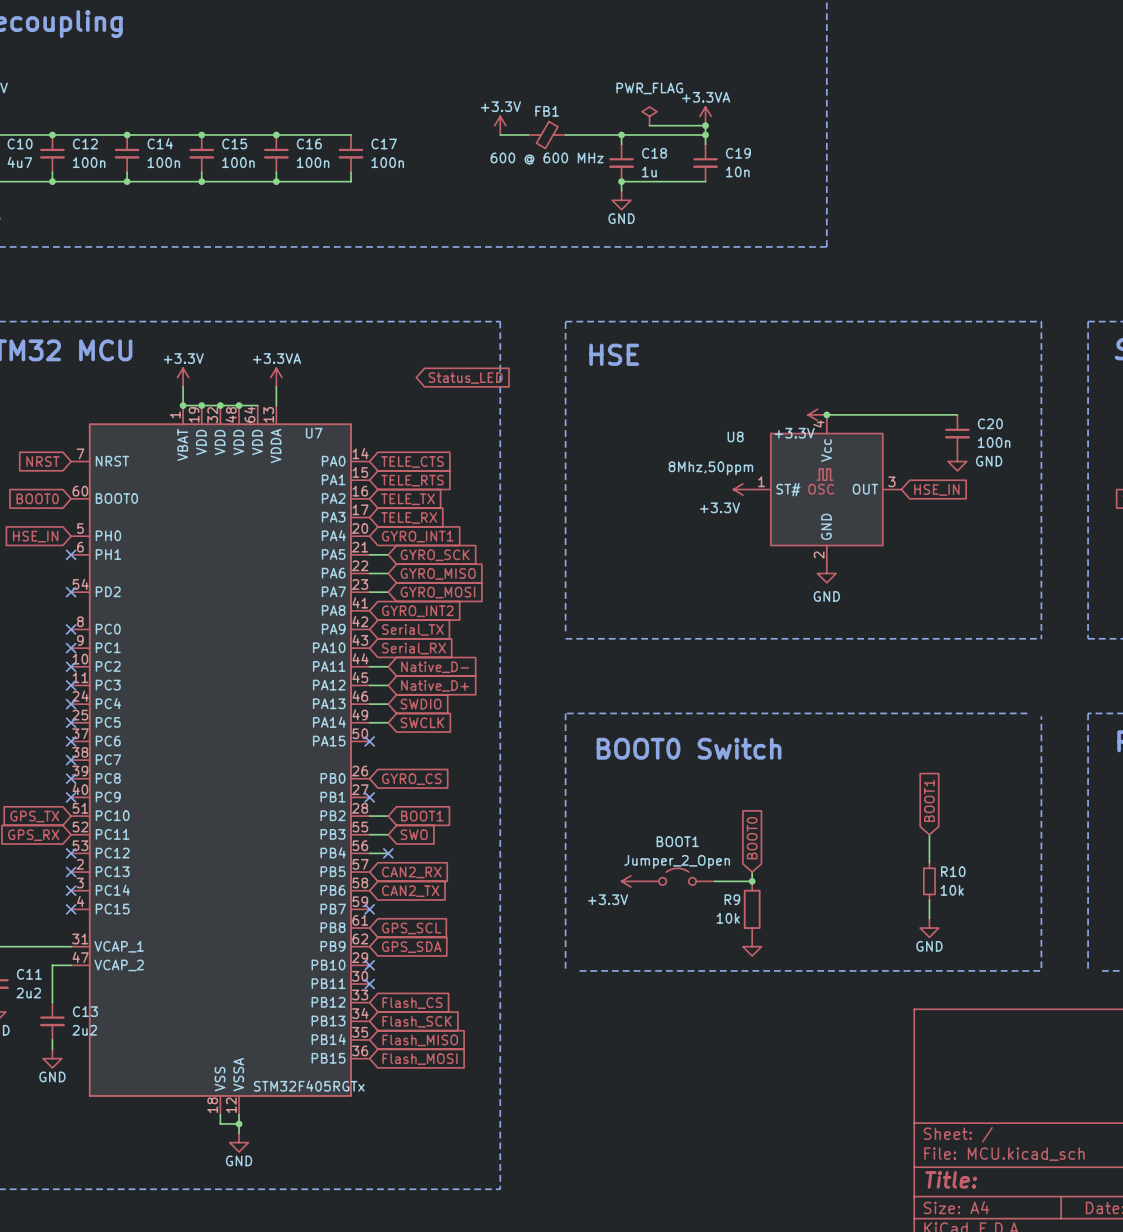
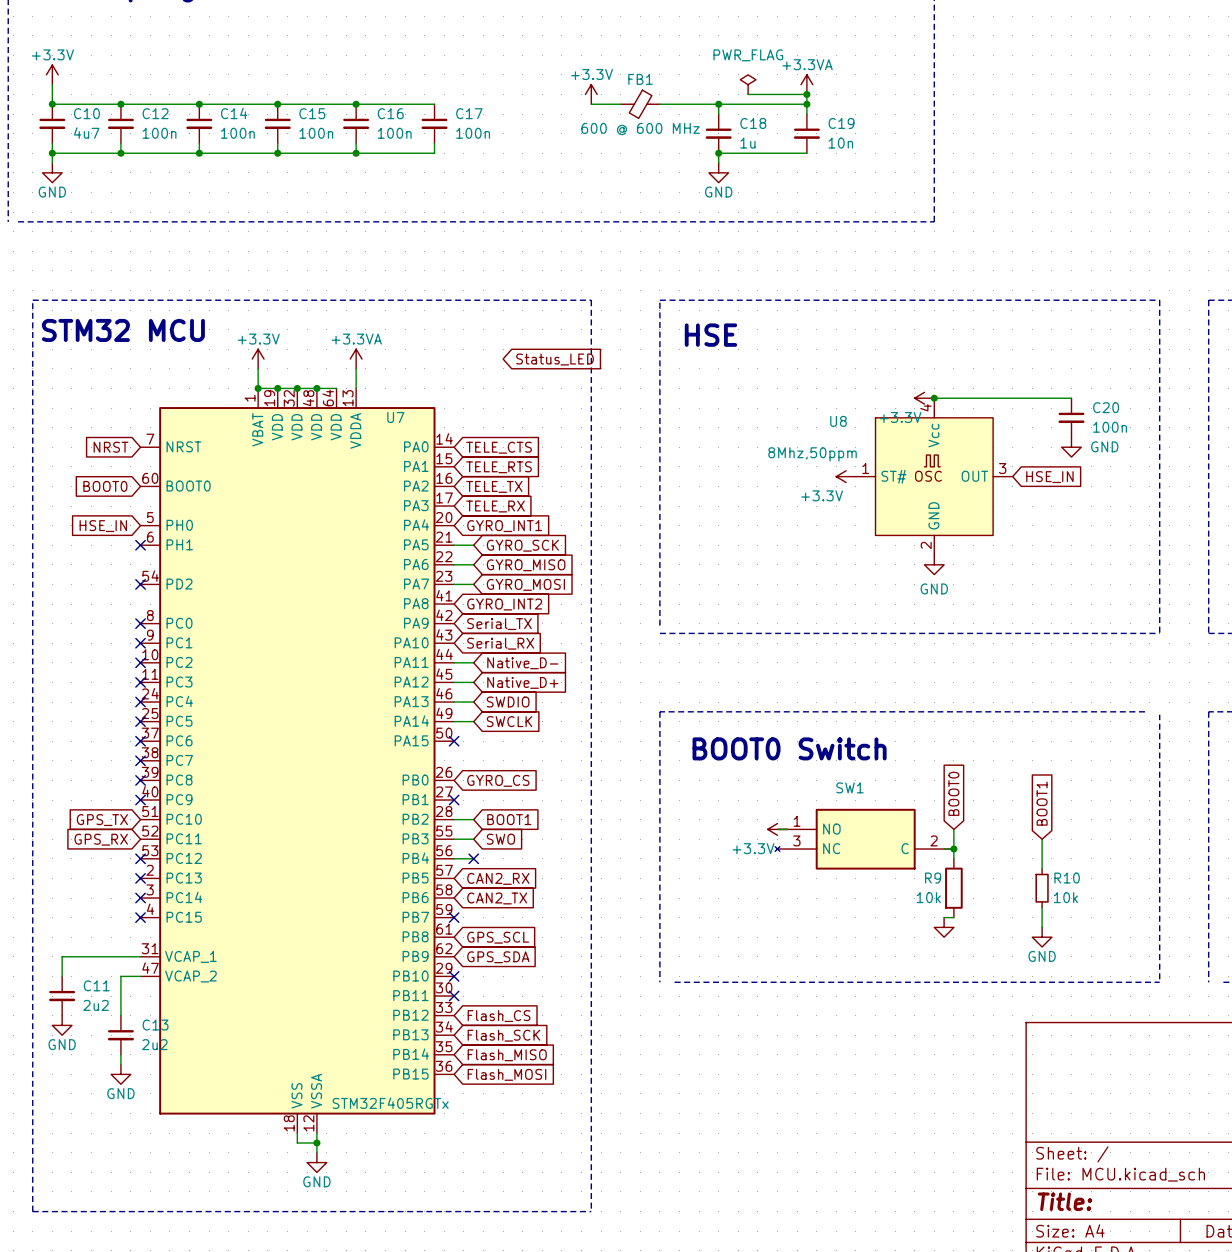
wire: none -> (777, 829) (787, 829)
wire: none -> (953, 829) (953, 858)
SW1: none -> (864, 839)
global label position: BOOT0 (752, 838) -> BOOT0 (953, 793)
wire: none -> (944, 849) (953, 849)
junction: none -> (953, 849)
wire: (752, 872) (752, 881) (714, 881) -> none
BOOT1: Jumper_2_Open (677, 876) -> none
power symbol position: +3.3V (630, 881) -> +3.3V (777, 829)
junction: (752, 881) -> none
R9 position: (752, 909) -> (953, 888)
wire: none -> (944, 917) (953, 917)
power symbol position: (752, 946) -> (944, 927)

